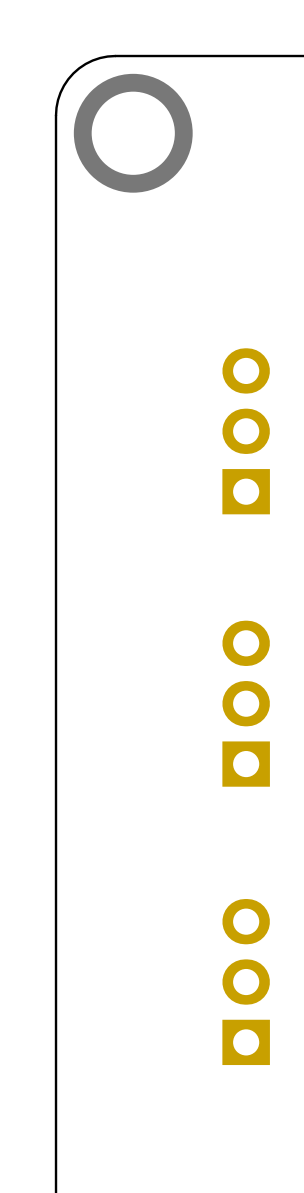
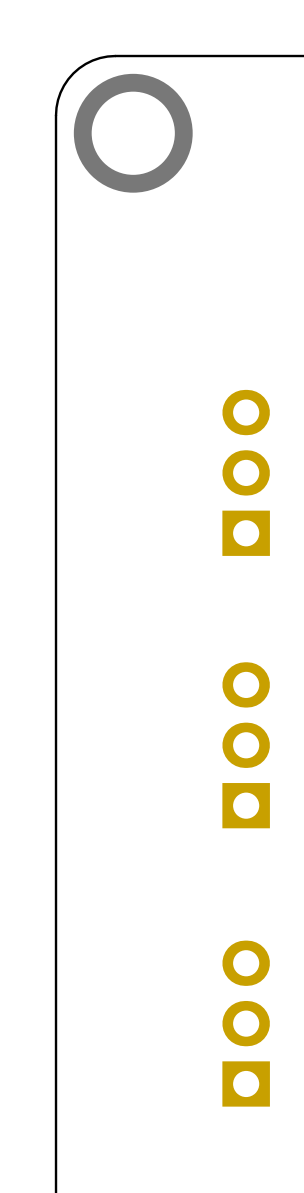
part position: (246, 431) -> (246, 472)
part position: (246, 703) -> (246, 745)
part position: (246, 982) -> (246, 1023)

